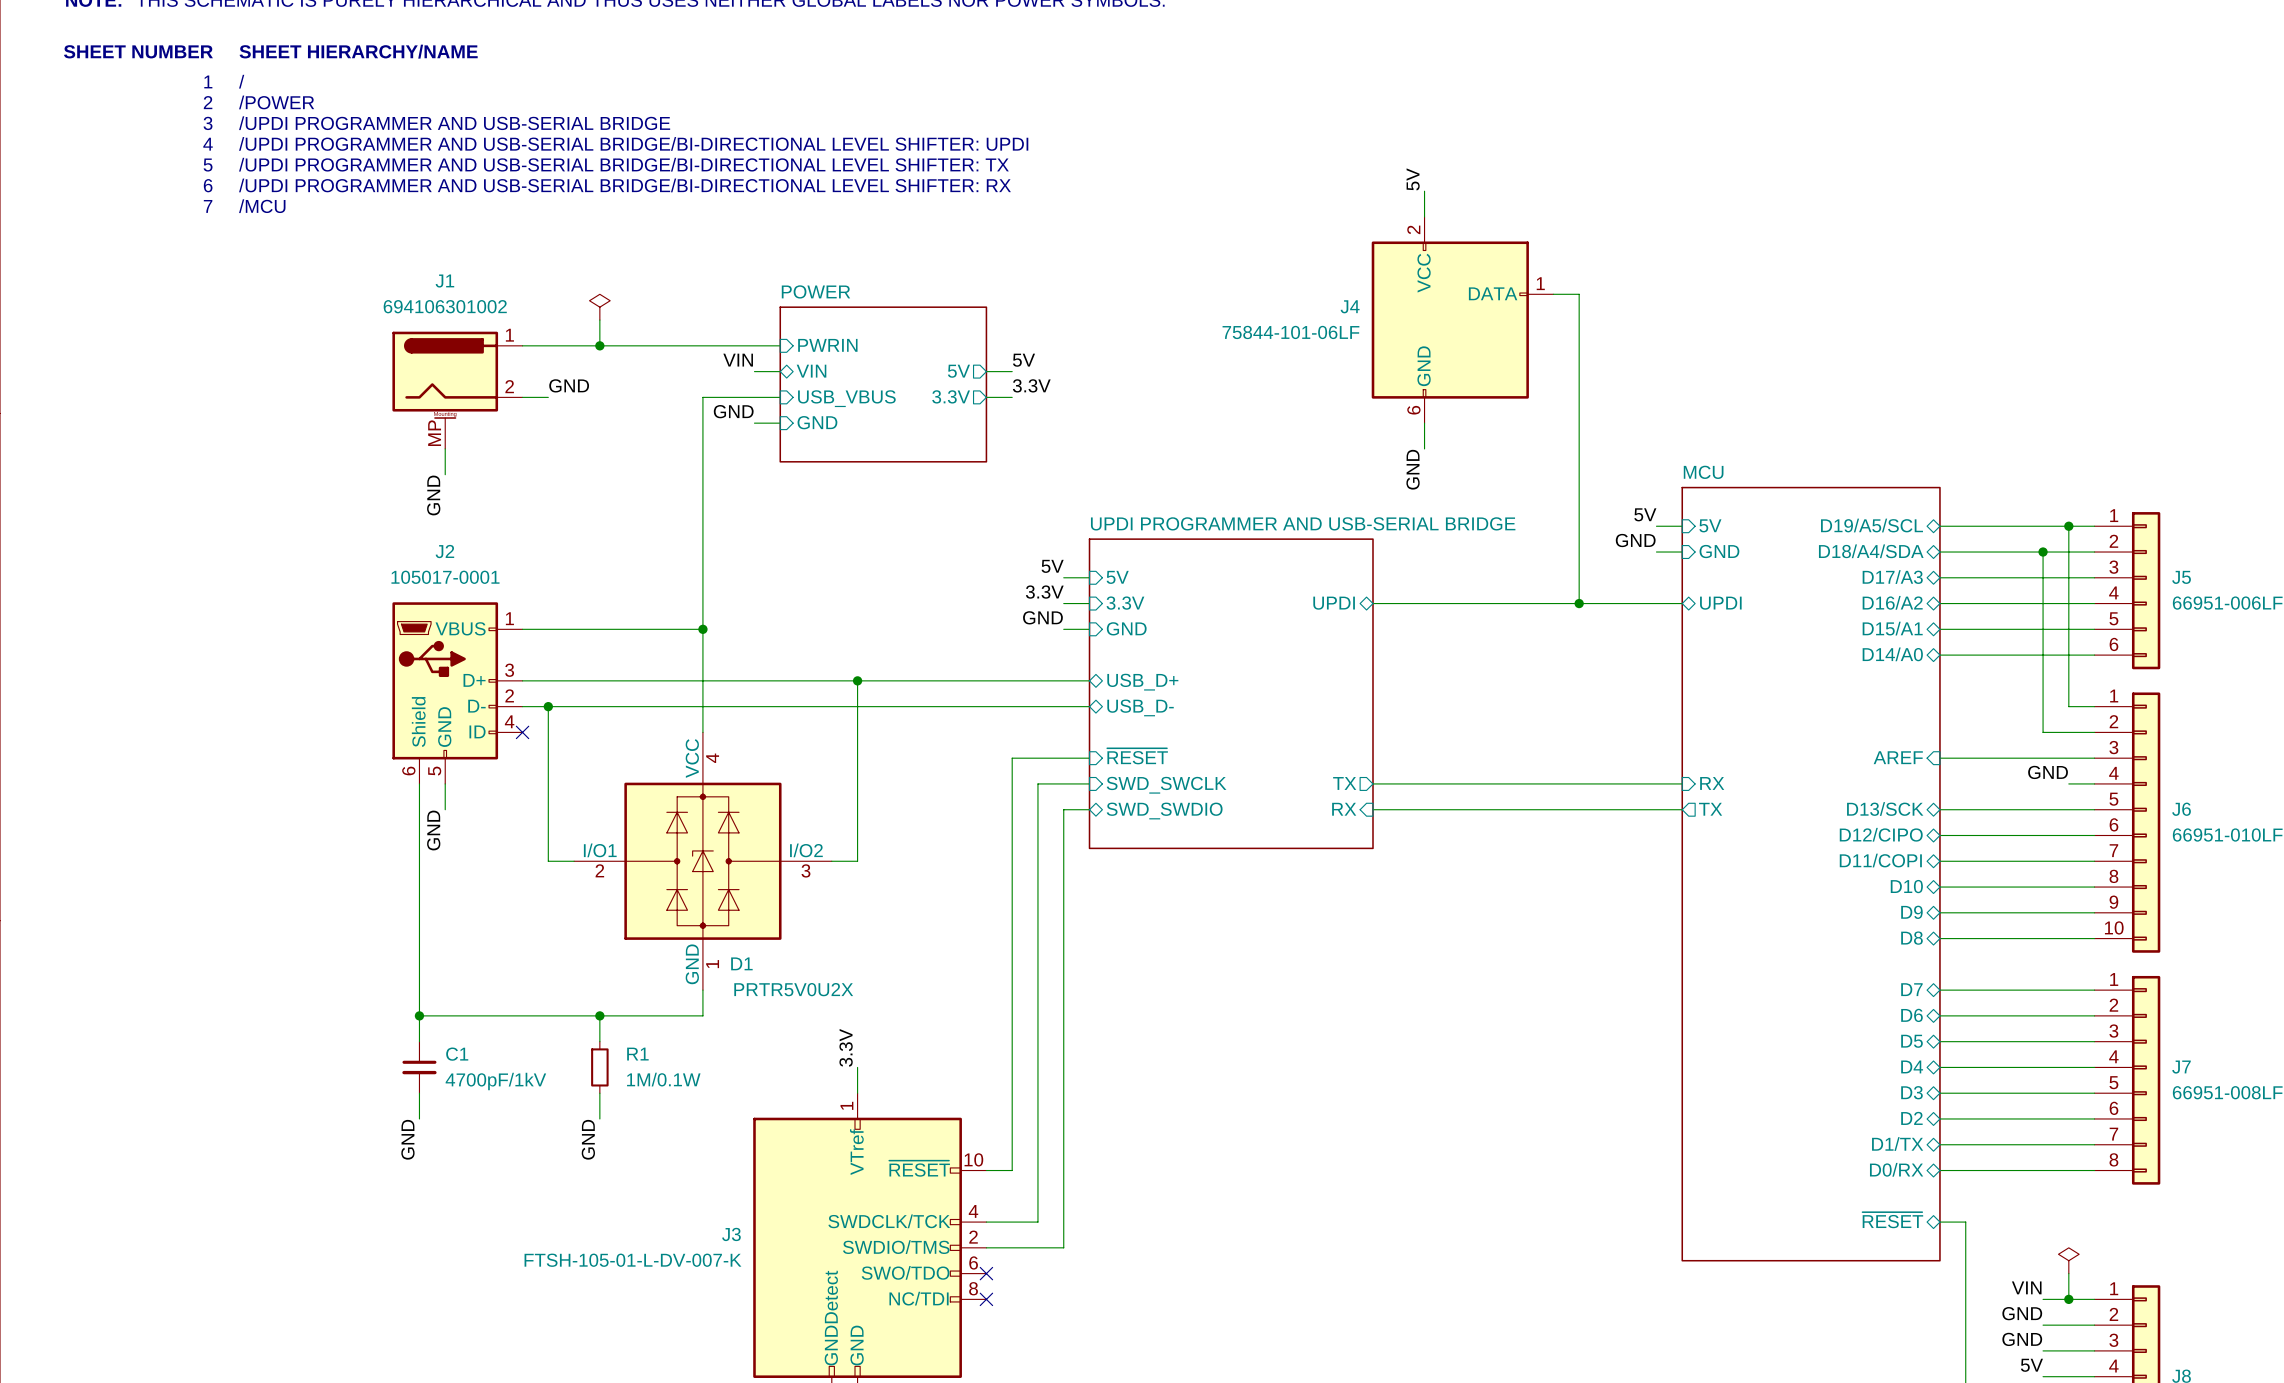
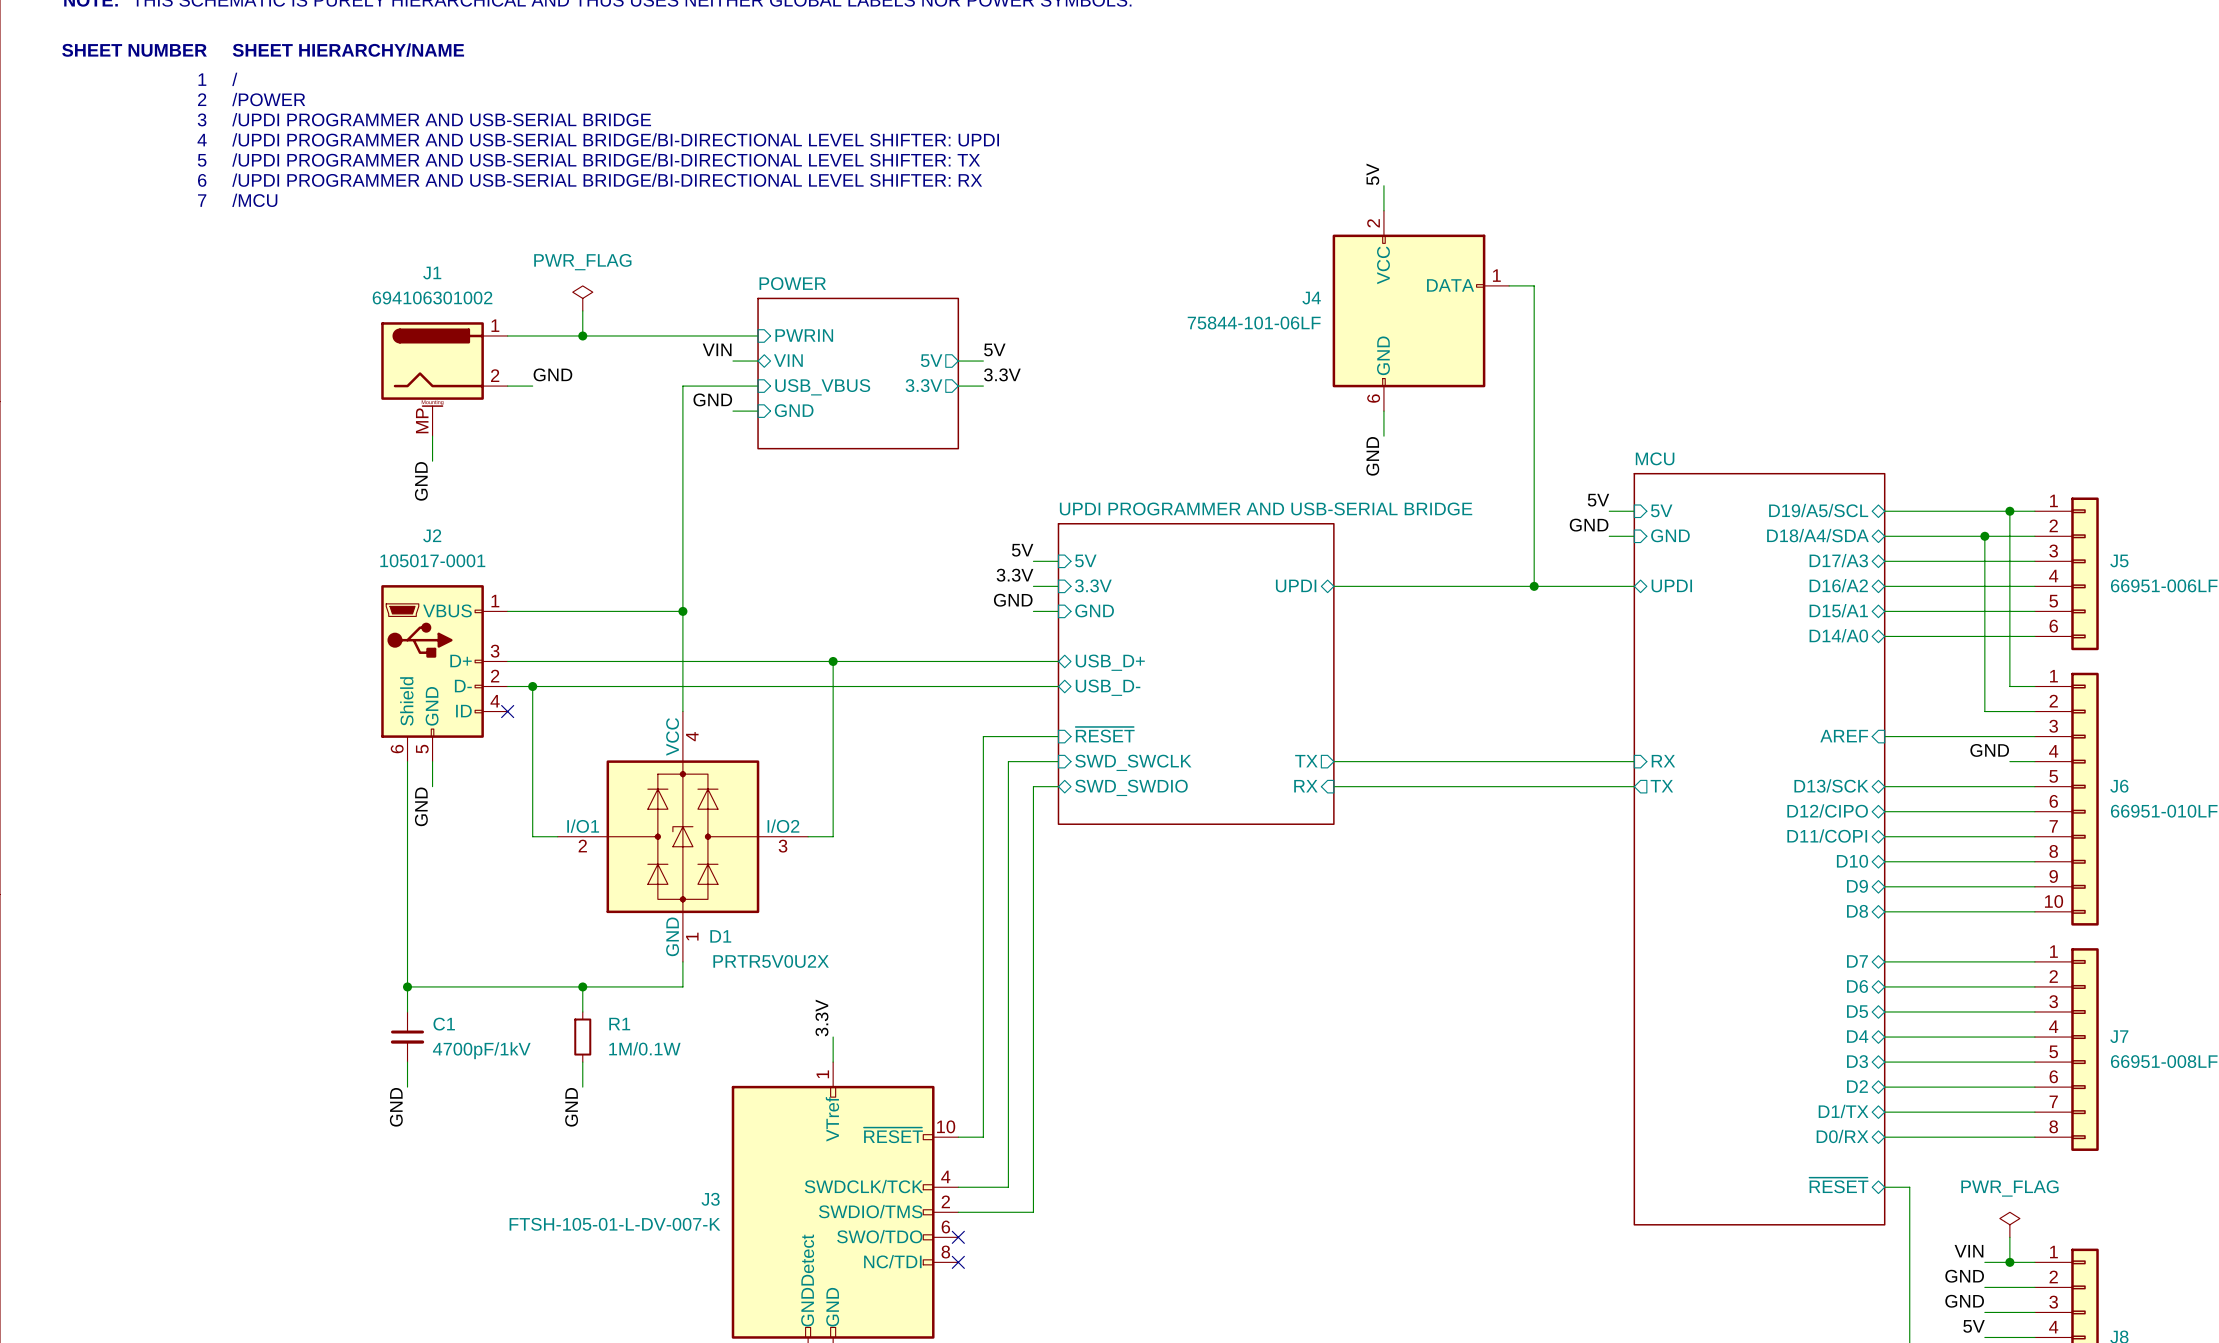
power symbol text: none -> PWR_FLAG (582, 262)
power symbol text: none -> PWR_FLAG (2009, 1188)

